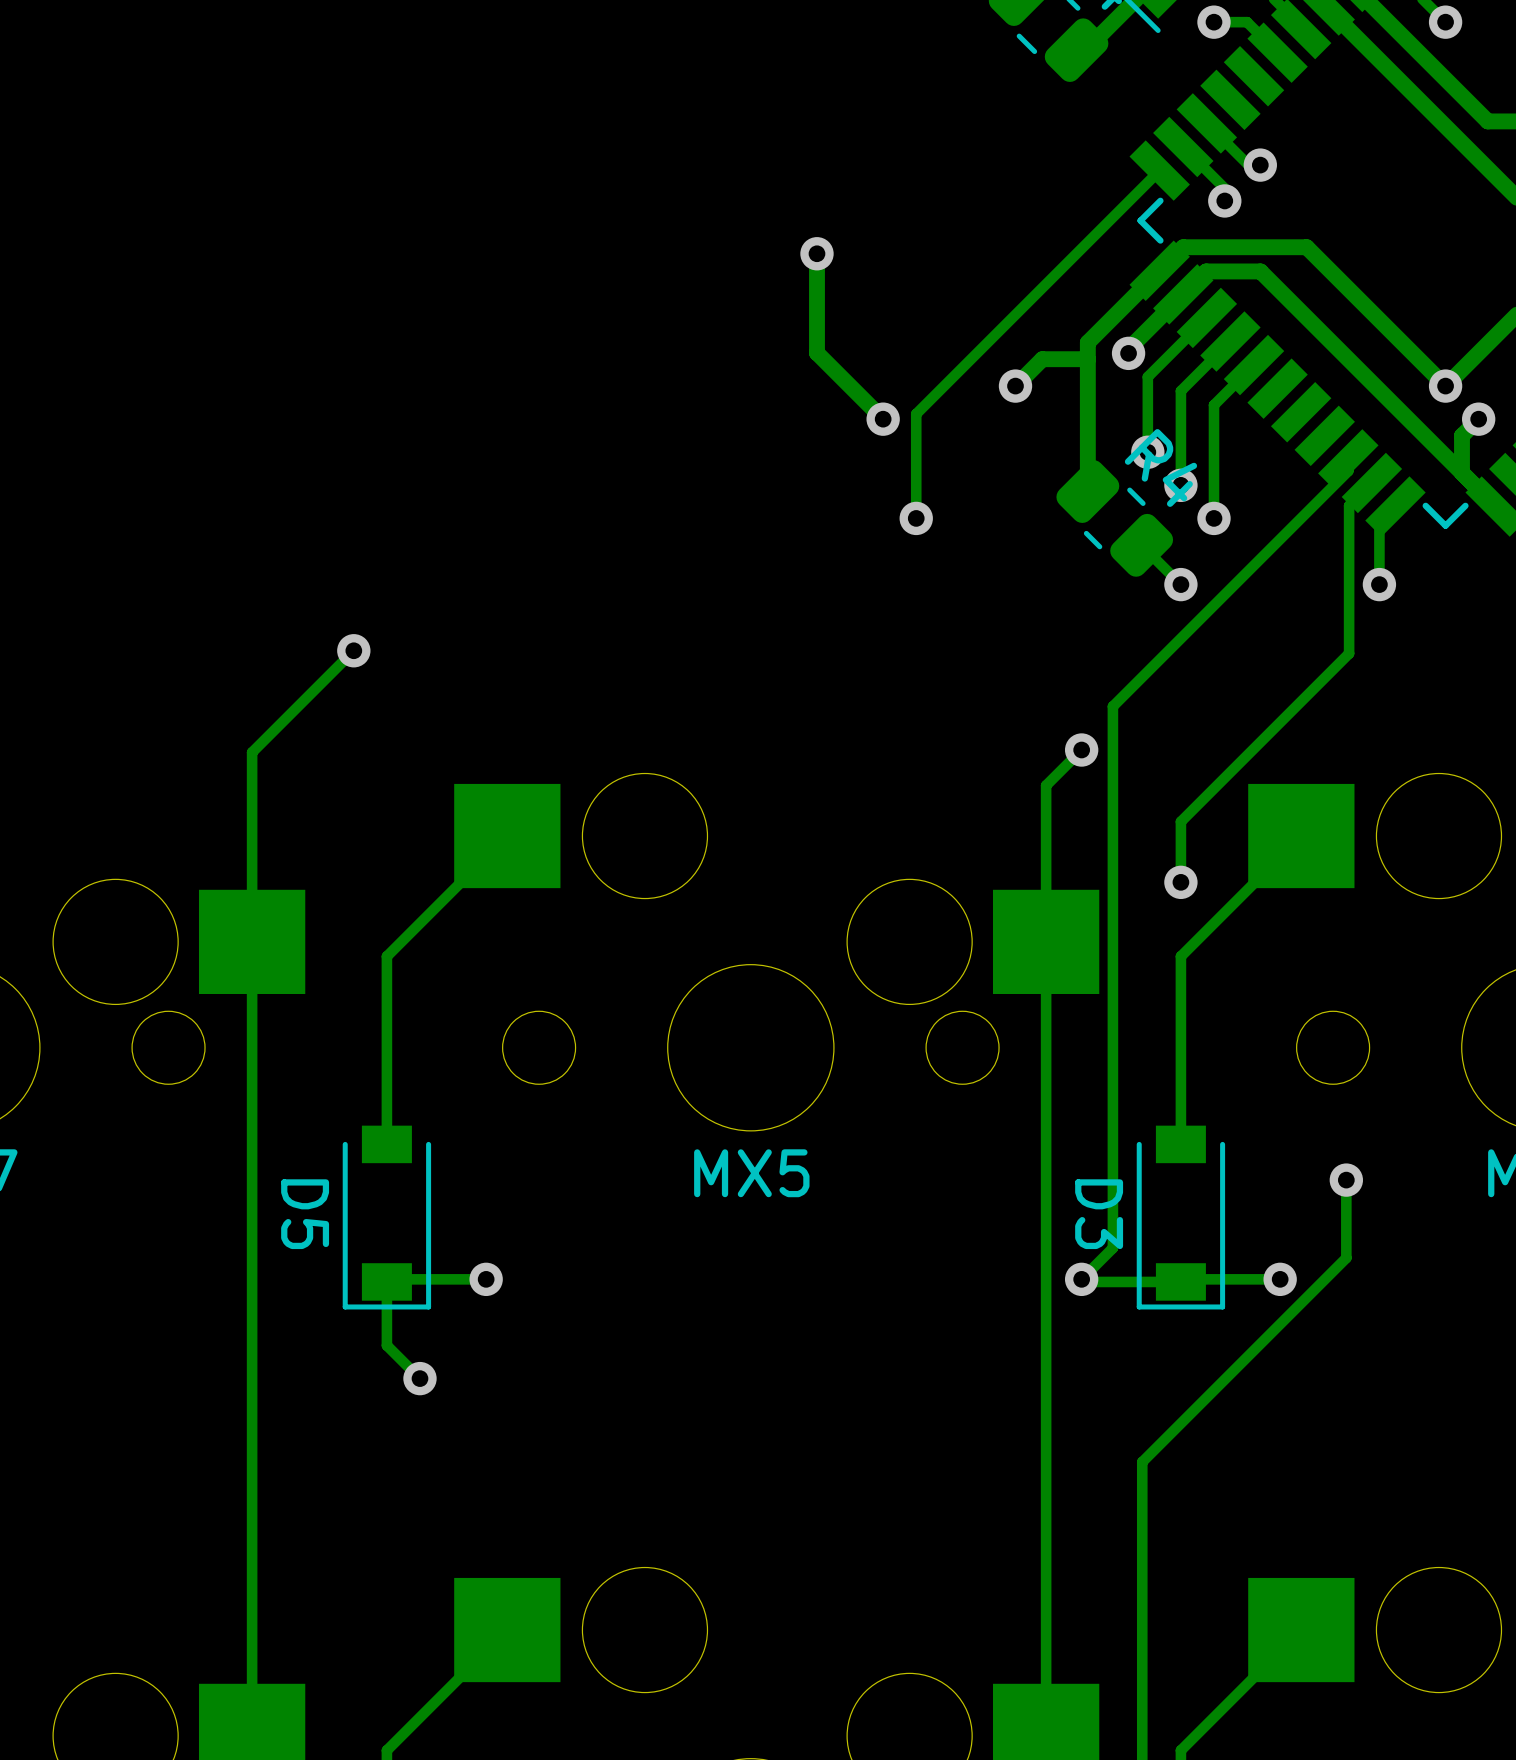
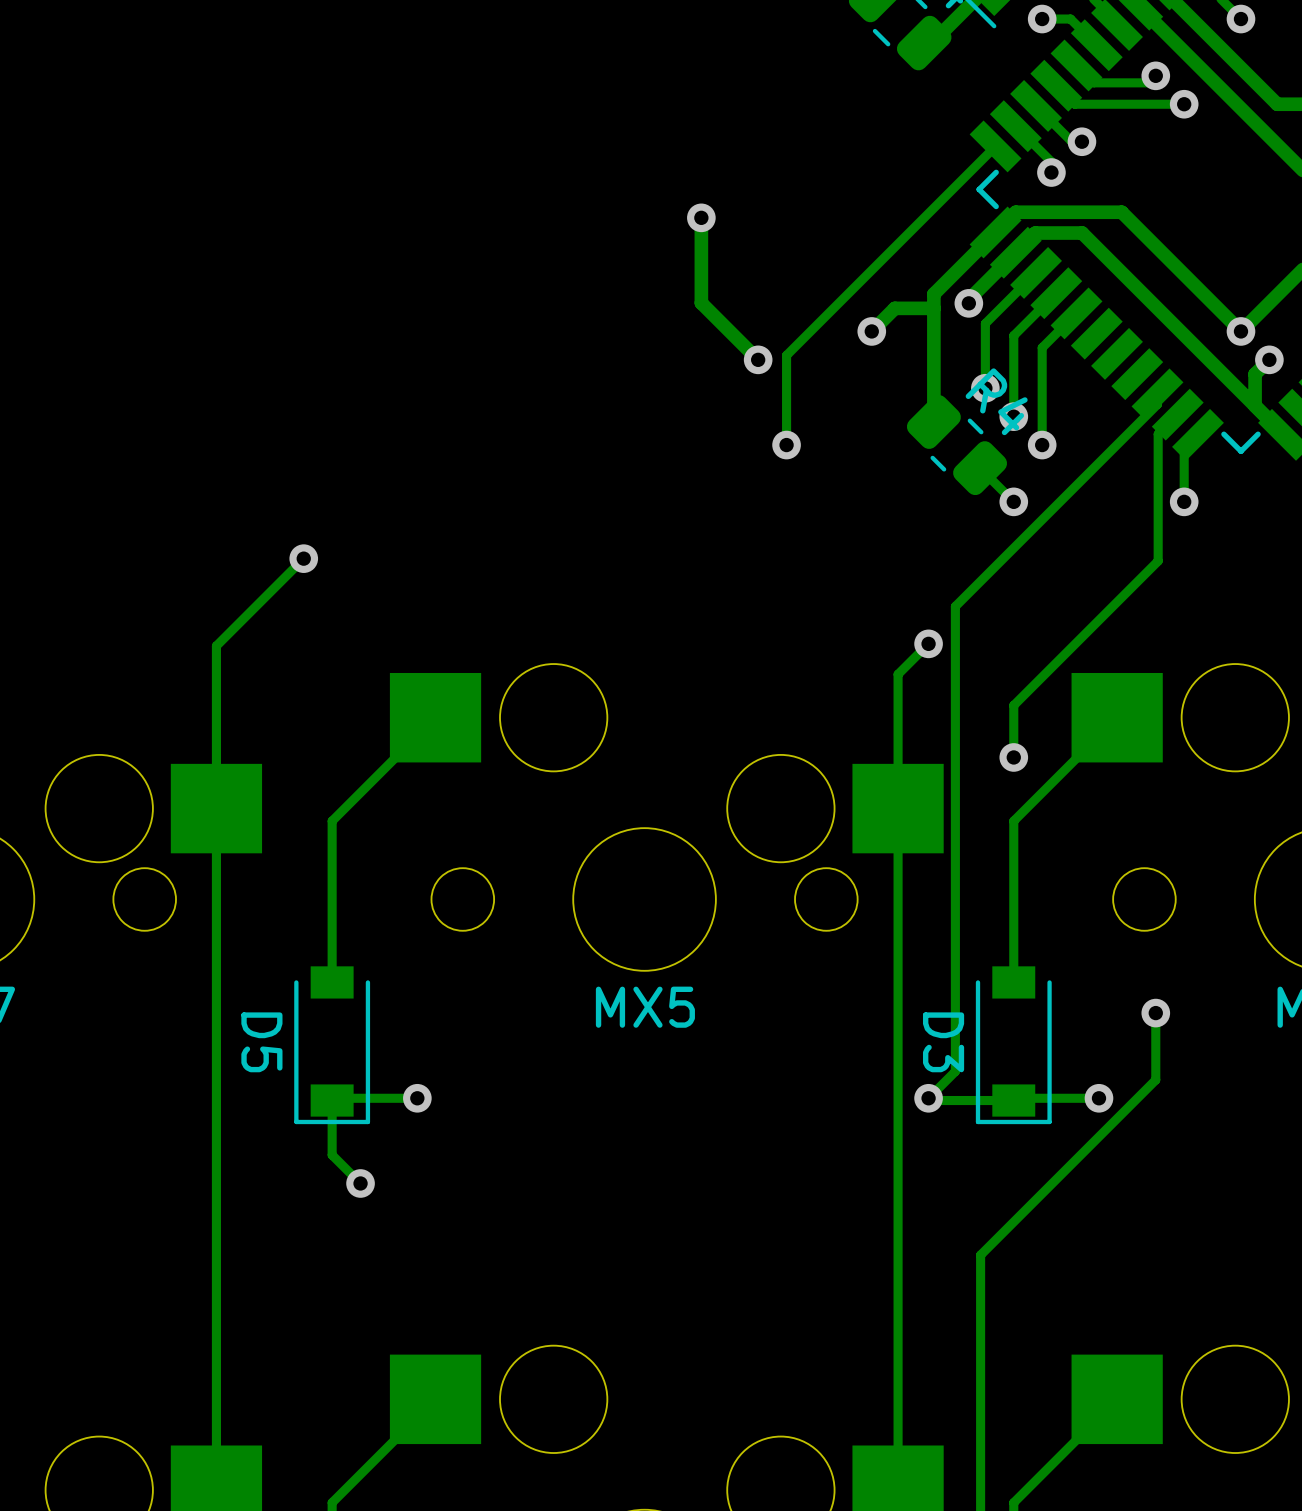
track: none -> (1076, 65) (1093, 82) (1148, 82) (1155, 75)
via: none -> (1155, 75)
track: none -> (1056, 85) (1074, 104) (1184, 104)
via: none -> (1184, 104)

